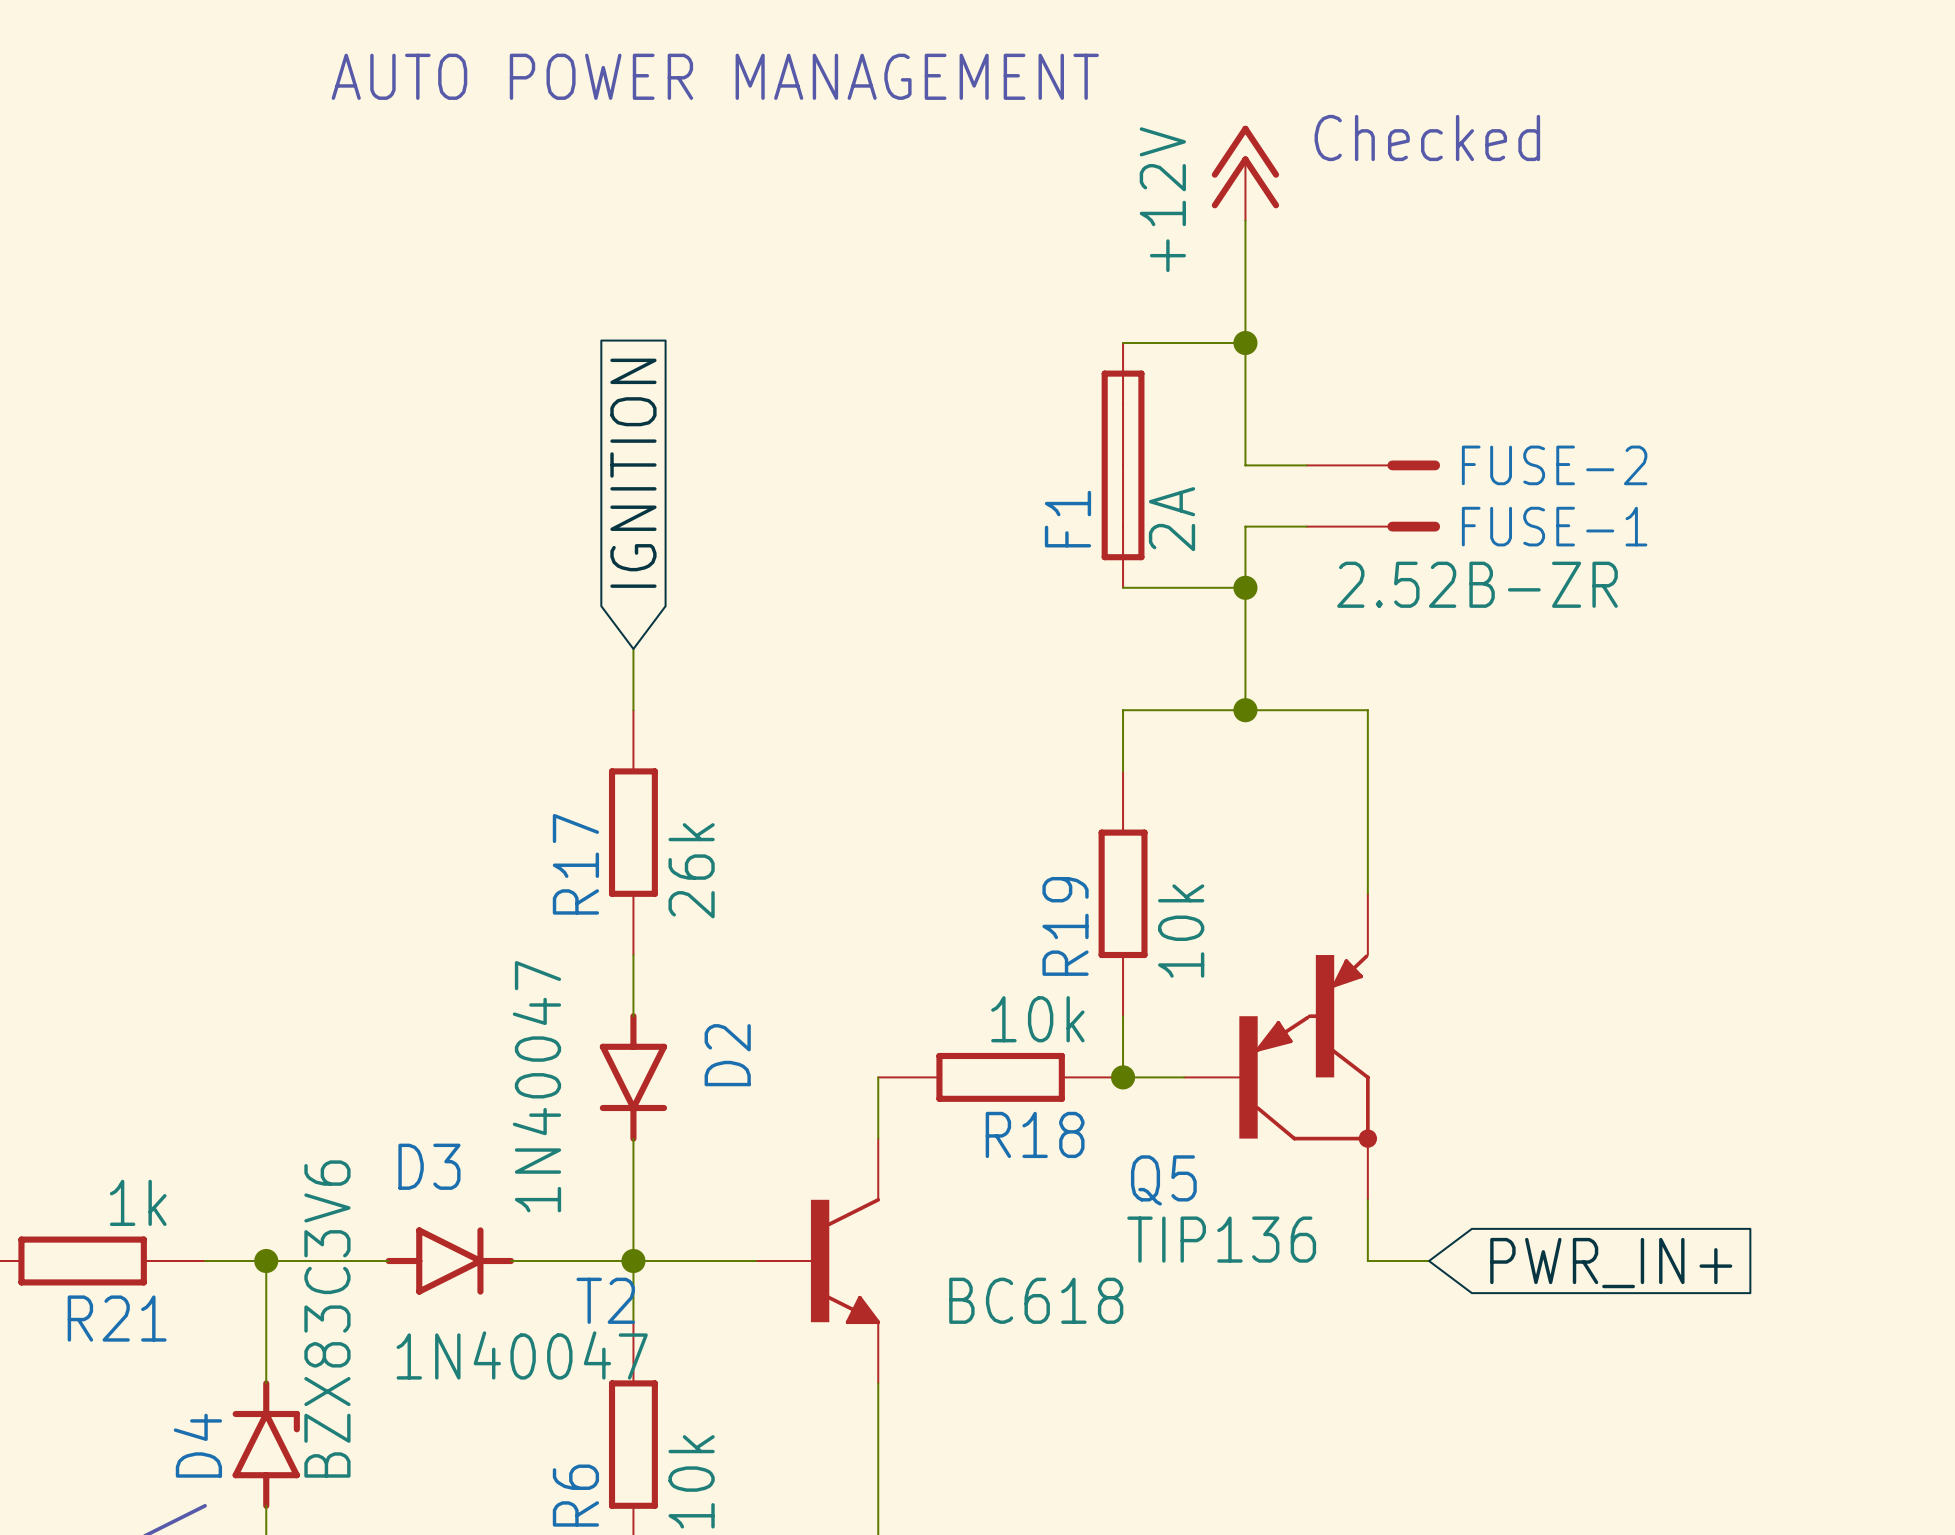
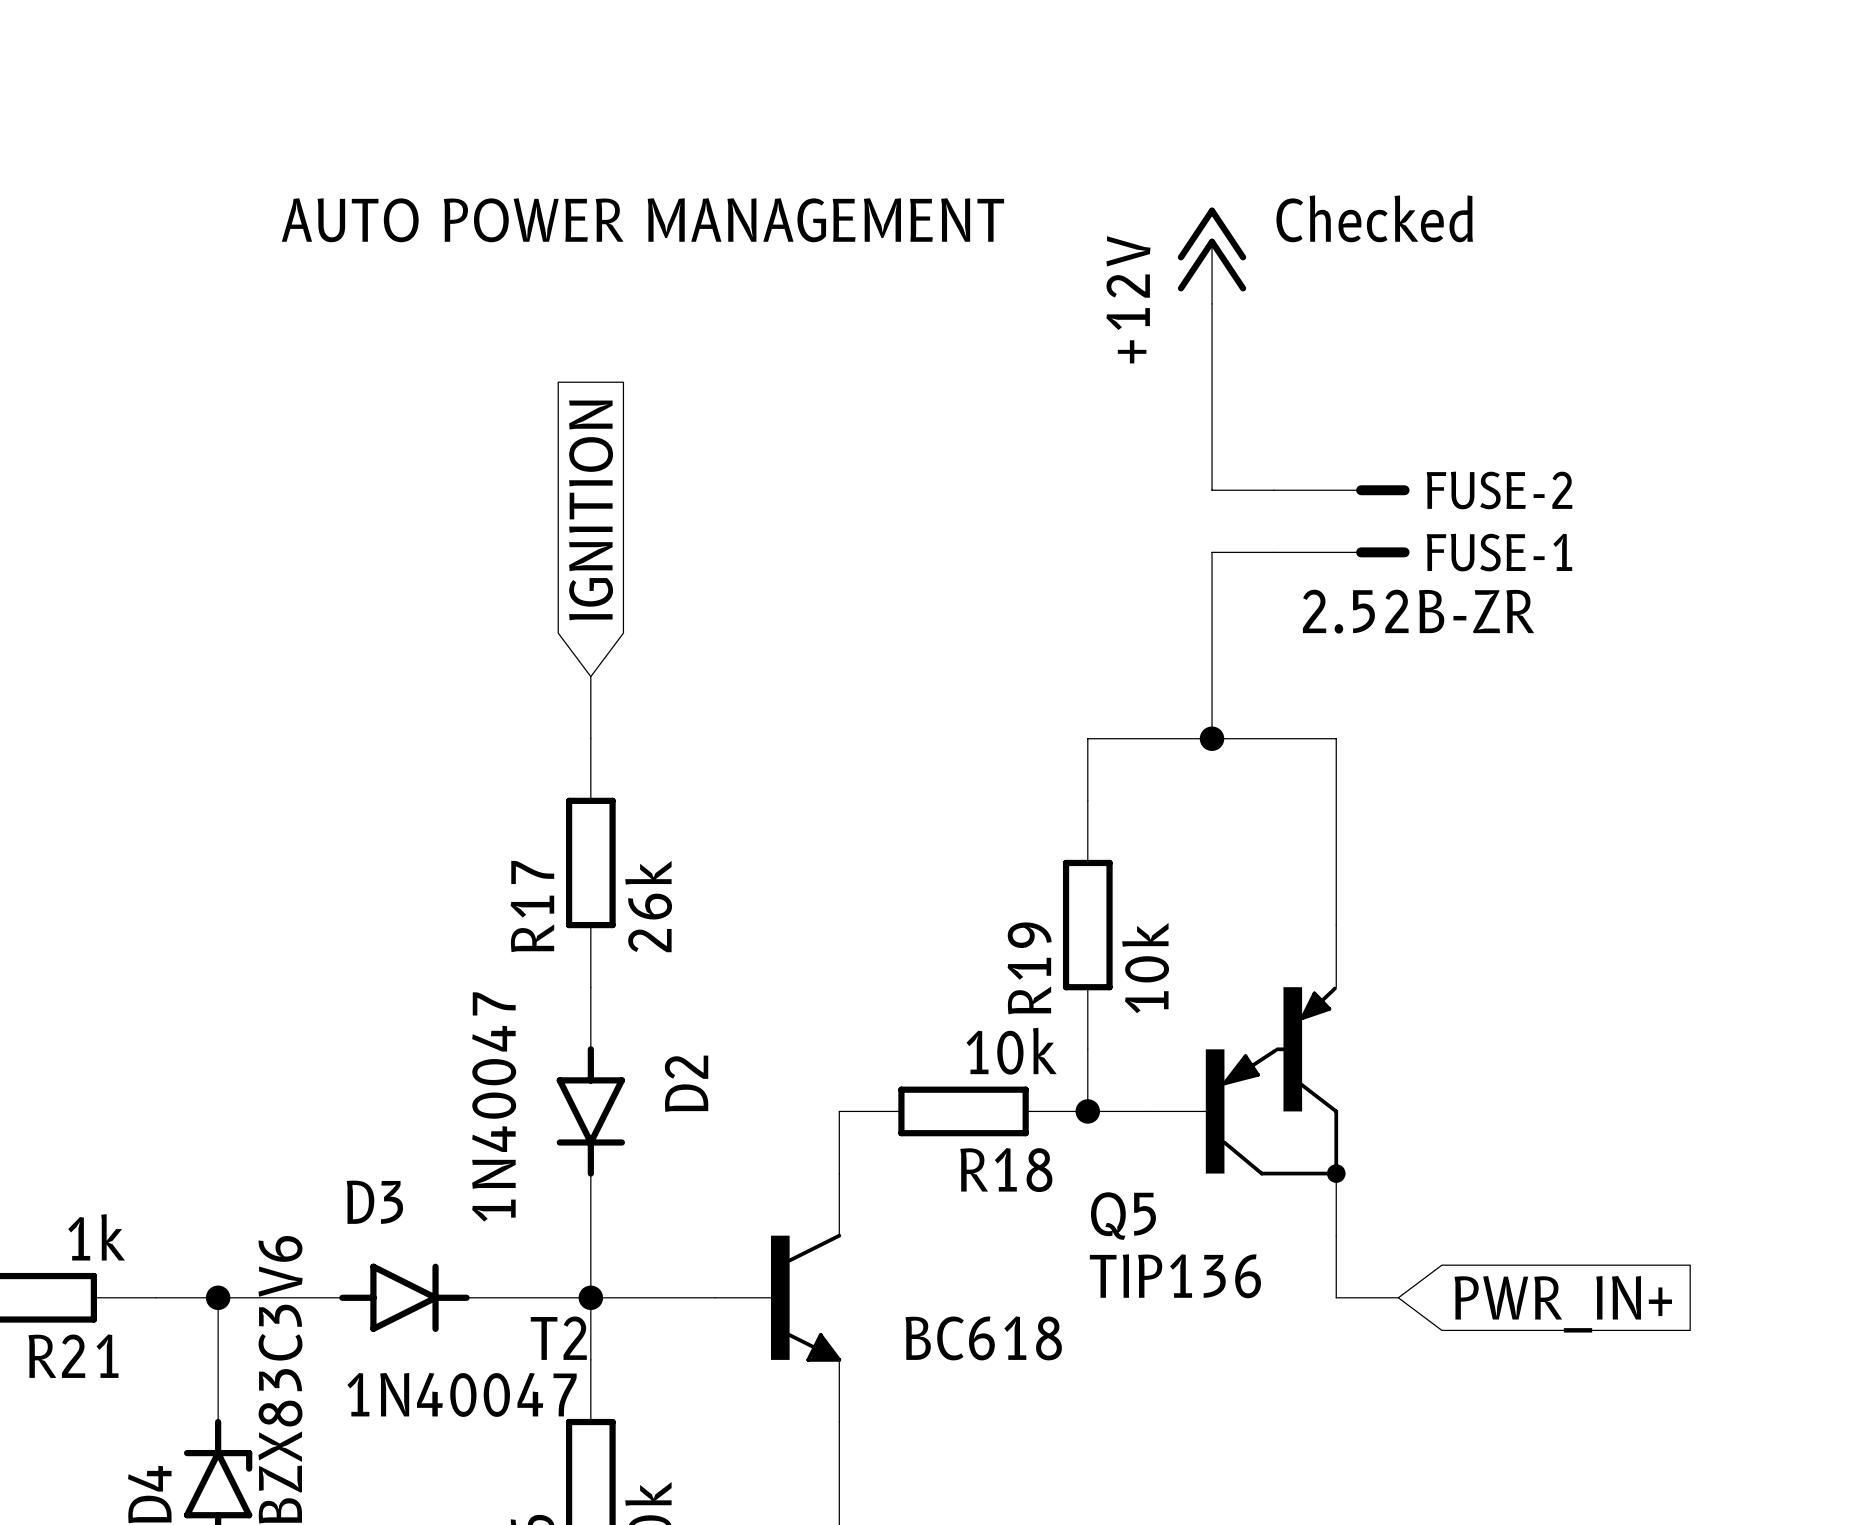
text position: AUTO POWER MANAGEMENT (715, 76) -> AUTO POWER MANAGEMENT (642, 220)
text position: Checked (1427, 137) -> Checked (1374, 218)
power symbol position: +12V (1245, 173) -> +12V (1212, 255)
wire: (1123, 343) (1245, 343) -> none
junction: (1245, 343) -> none
F1: 2A (1123, 465) -> none
wire: (1123, 587) (1245, 587) -> none
junction: (1245, 587) -> none

